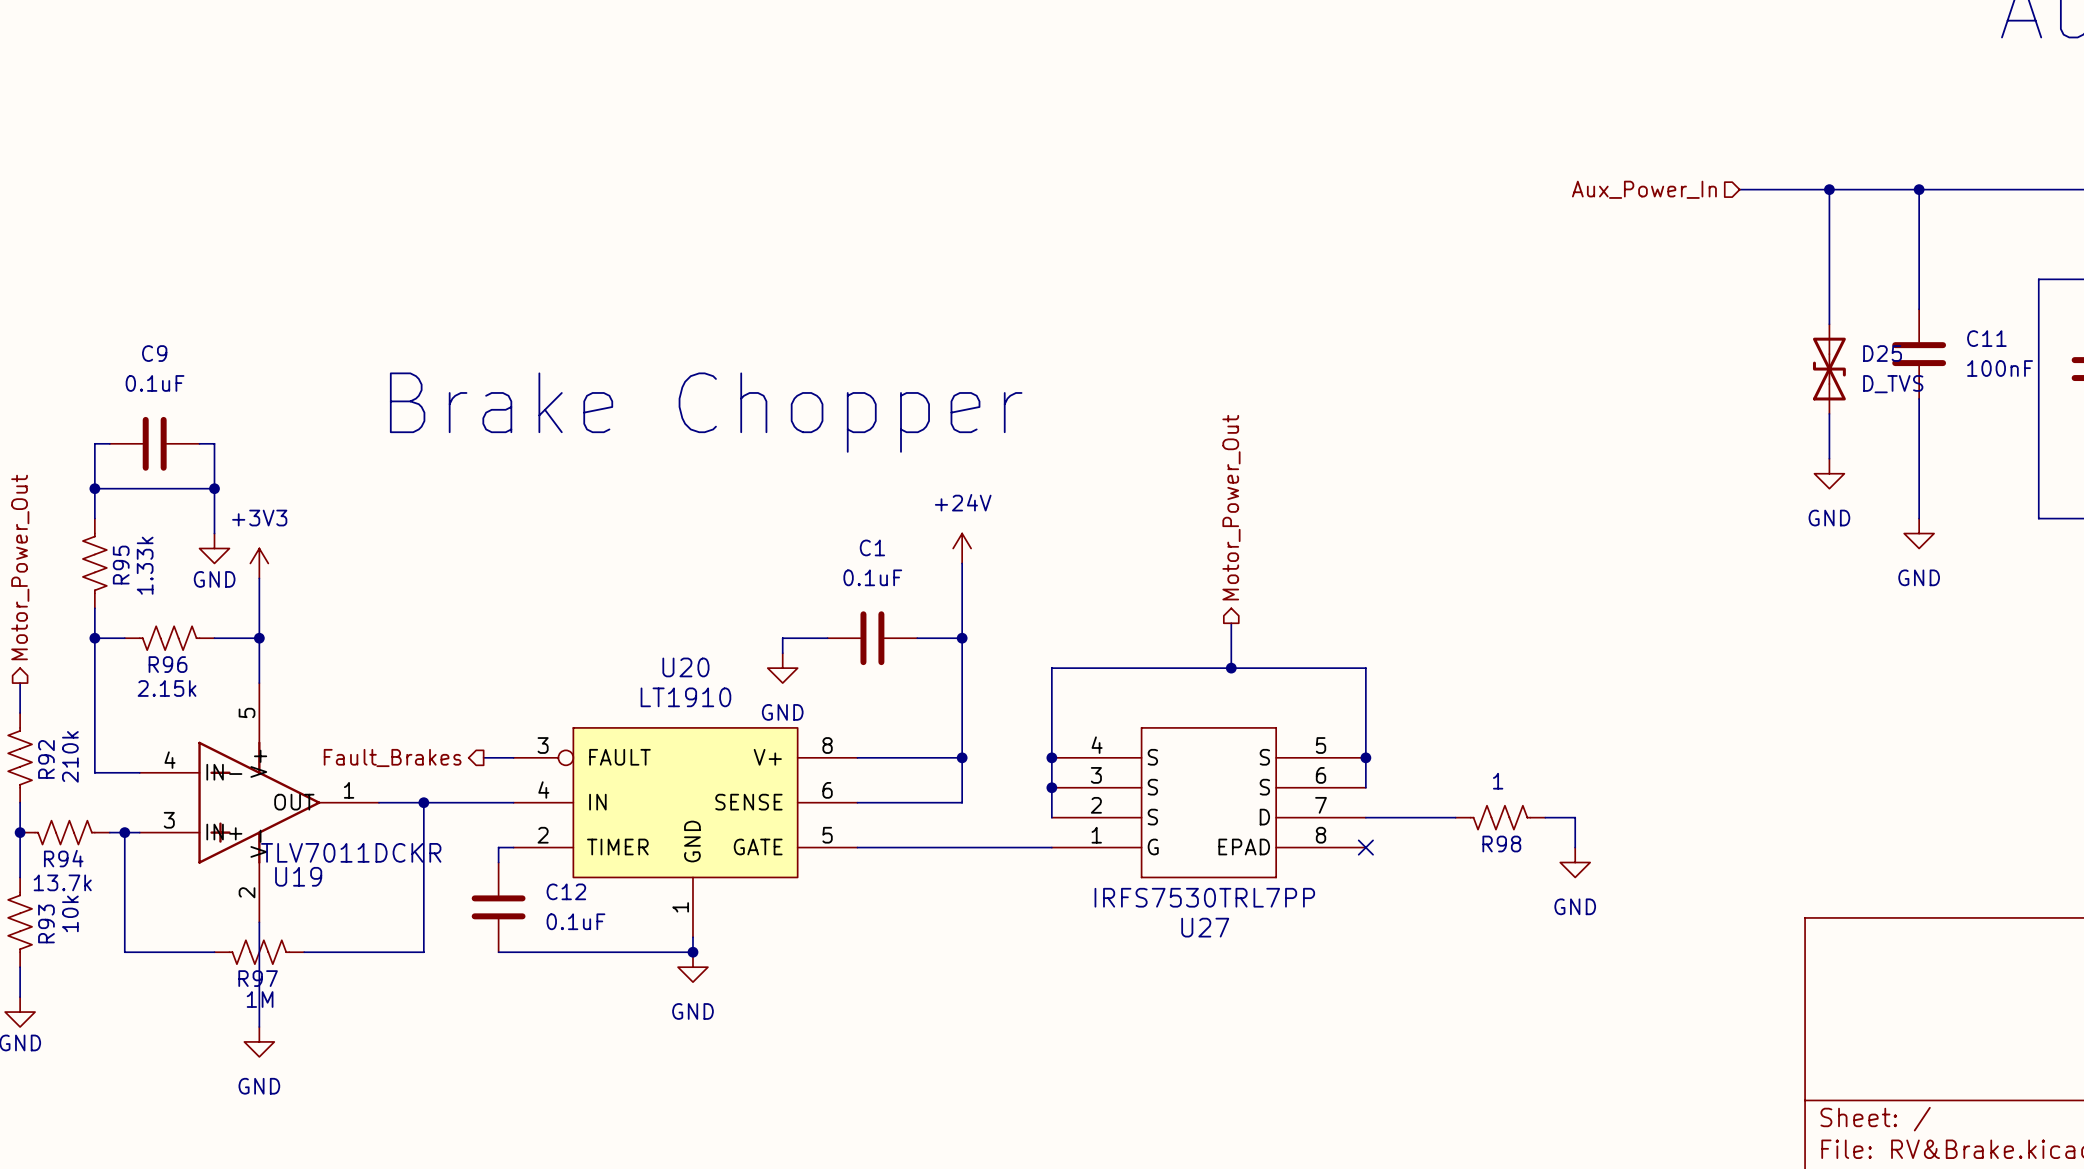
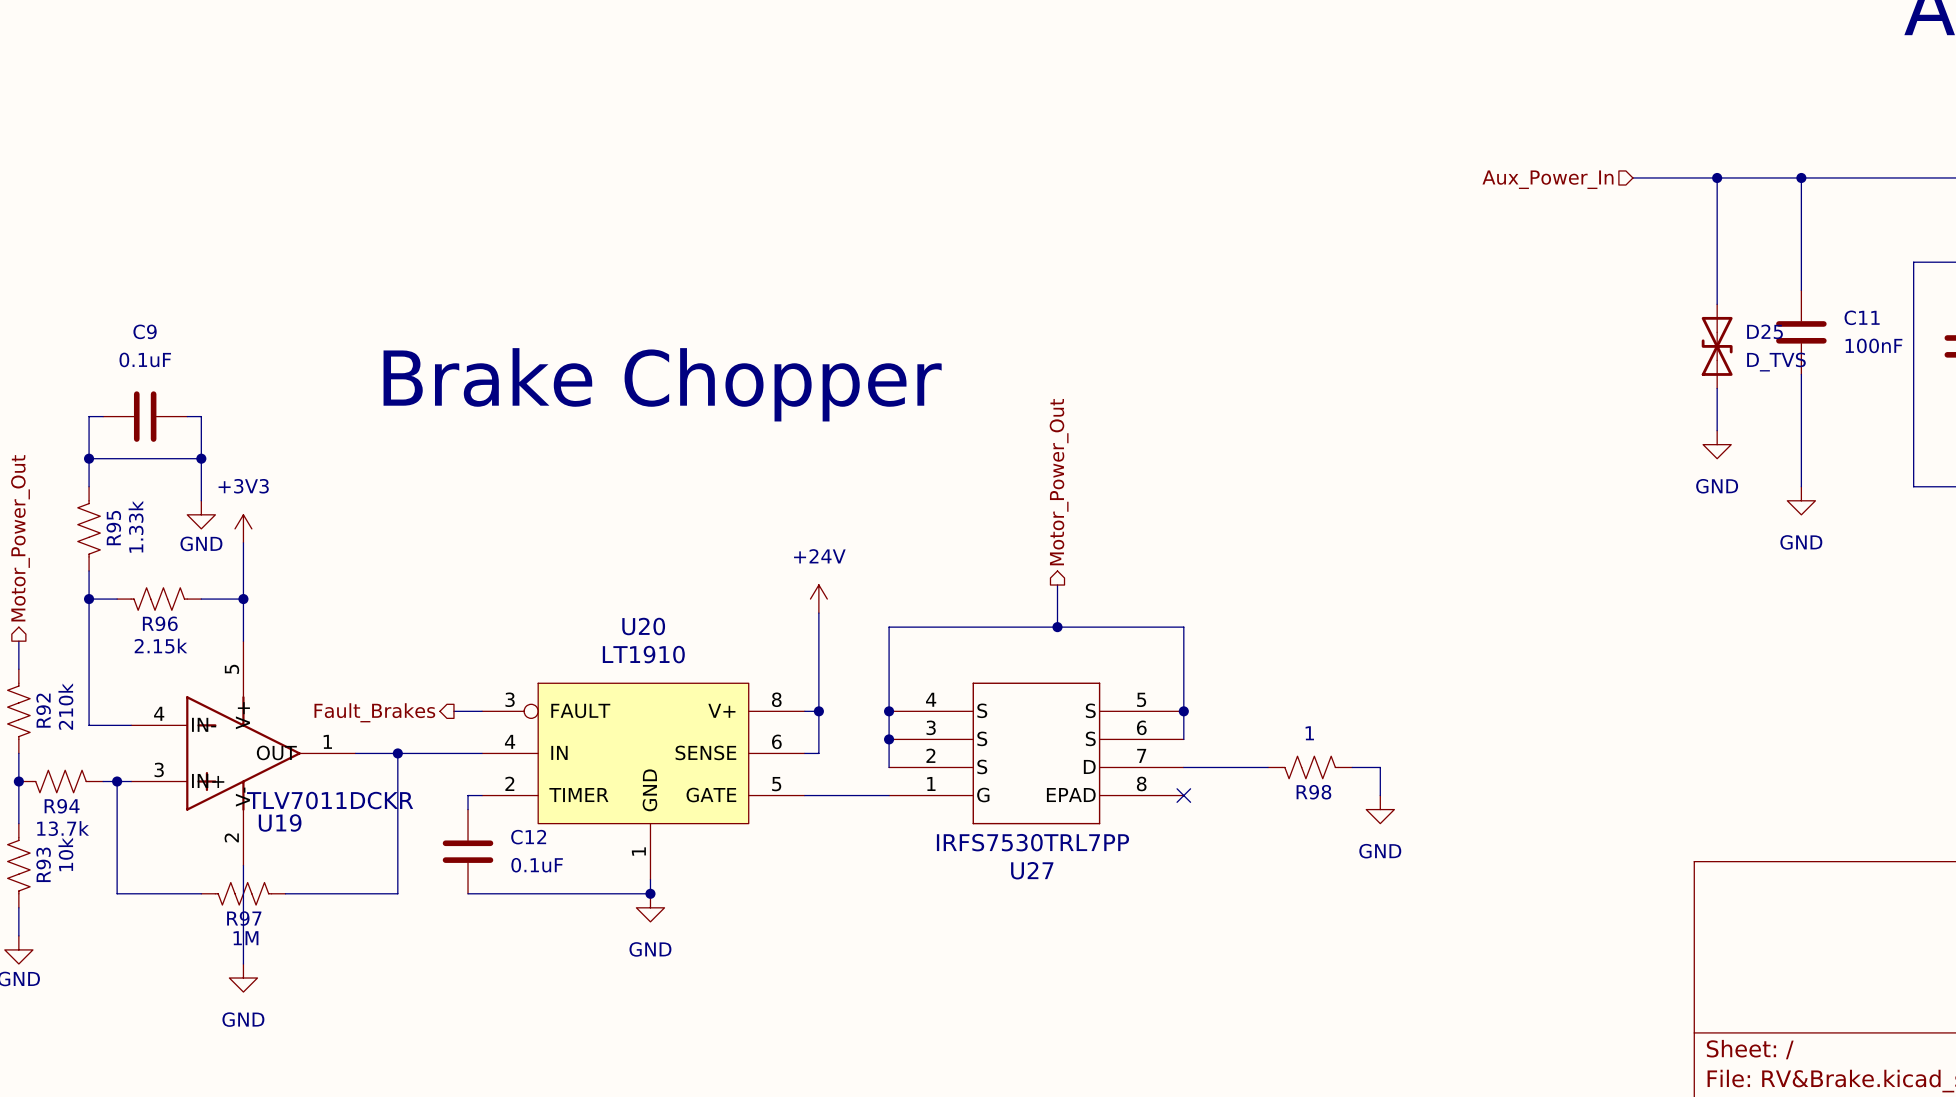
hierarchical label position: Motor_Power_Out (1231, 507) -> Motor_Power_Out (1059, 482)
power symbol position: +24V (962, 548) -> +24V (818, 599)
wire: (962, 563) (962, 802) (872, 802) -> (818, 613) (818, 753)
wire: (1231, 623) (1231, 668) -> (1057, 585) (1057, 627)
wire: (827, 638) (782, 638) (782, 653) -> none
C1: 0.1uF (872, 638) -> none
wire: (917, 638) (962, 638) -> none
junction: (962, 638) -> none
power symbol: GND (782, 668) -> none
wire: (1051, 668) (1051, 817) -> (987, 627) (889, 627) (889, 767)
junction: none -> (1057, 627)
junction: (1231, 668) -> none
wire: (1261, 668) (1365, 668) (1365, 787) -> (1183, 627) (1183, 739)
wire: (872, 757) (962, 757) -> none
junction: none -> (818, 711)
junction position: (962, 757) -> (889, 711)
junction: (1051, 757) -> none
junction: none -> (1183, 711)
junction: (1365, 757) -> none
junction: none -> (889, 739)
junction: (1051, 787) -> none
U27 position: (1208, 802) -> (1036, 753)
wire: (1365, 817) (1440, 817) -> none
wire: none -> (1366, 767) (1380, 767) (1380, 795)
R98 position: (1500, 817) -> (1310, 767)
wire: (1545, 817) (1575, 817) (1575, 847) -> none
no-connect mark: none -> (1183, 795)
no-connect mark: (1365, 847) -> none
power symbol position: GND (1575, 862) -> GND (1380, 809)

